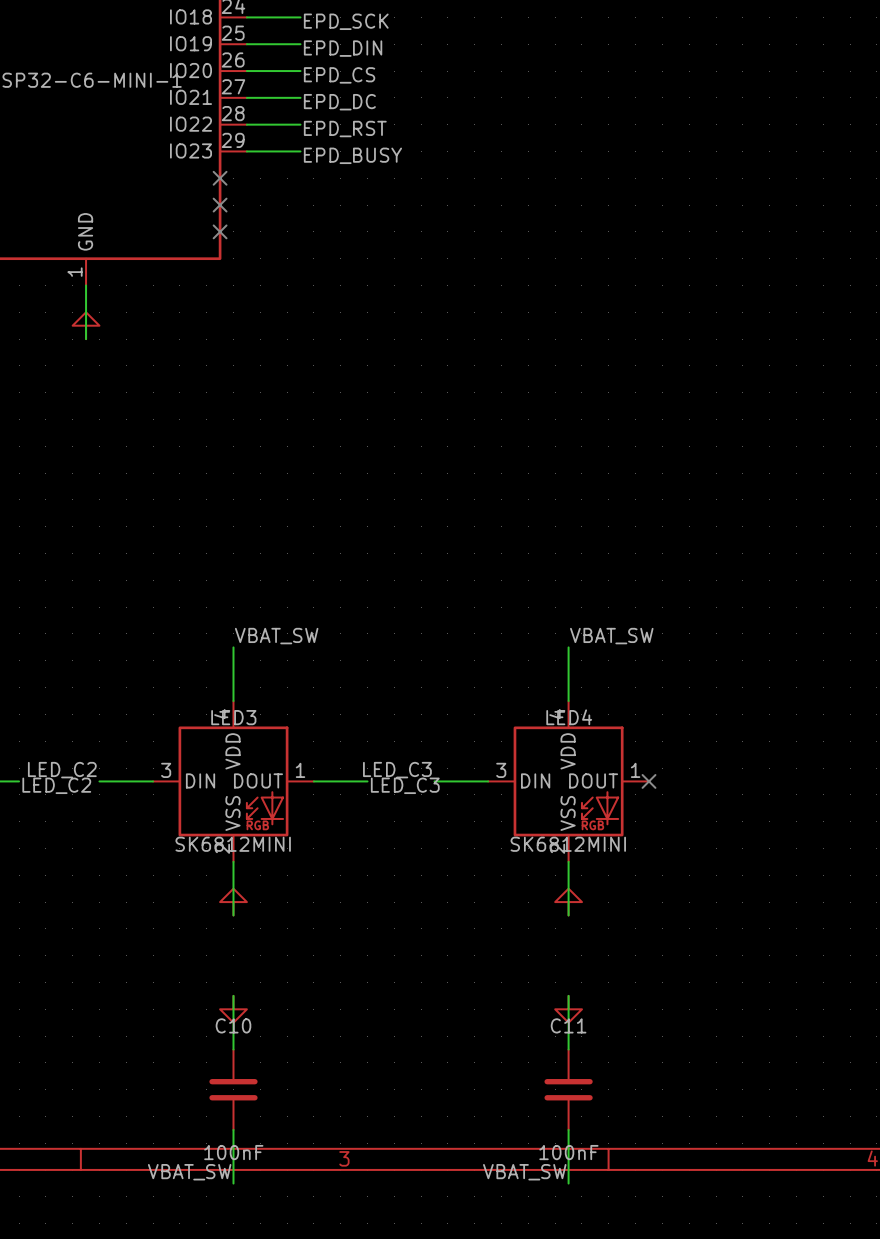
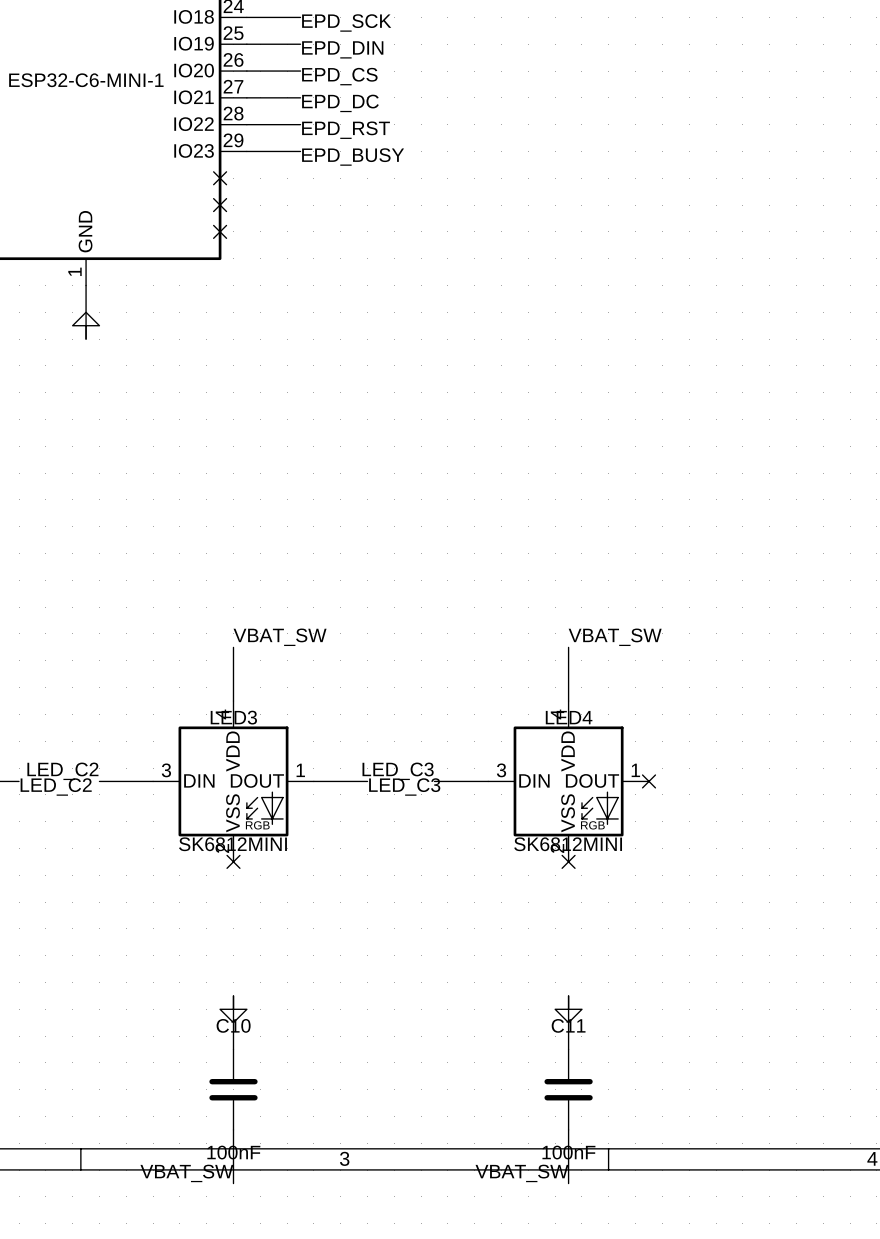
wire: (233, 861) (233, 915) -> none
no-connect mark: none -> (233, 861)
wire: (568, 861) (568, 915) -> none
no-connect mark: none -> (568, 861)
power symbol: (233, 902) -> none
power symbol: (568, 902) -> none

